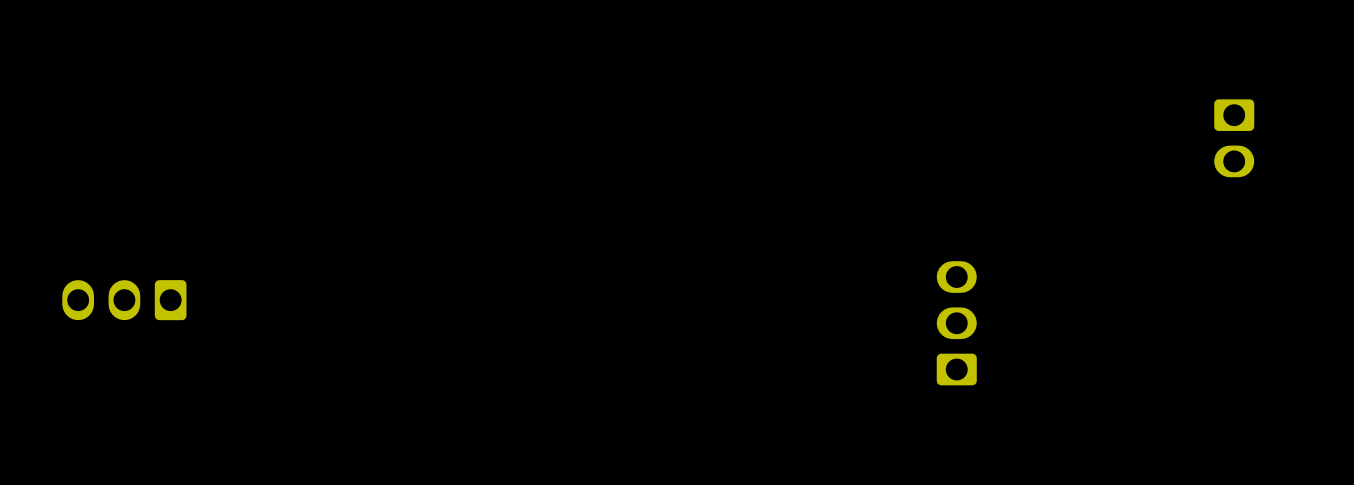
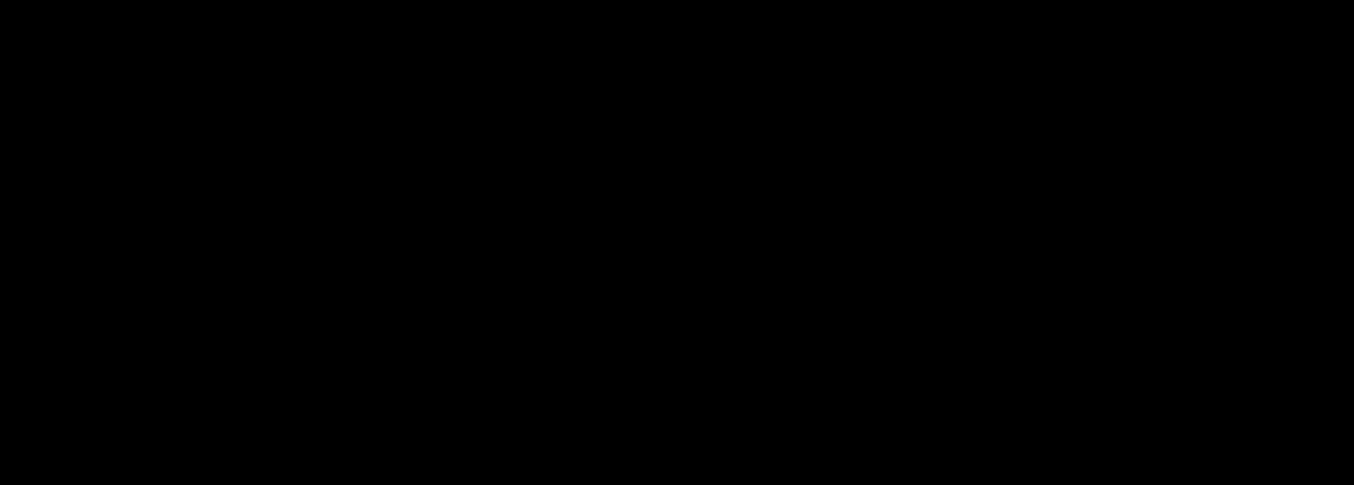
part: (1234, 138) -> none
part: (124, 300) -> none
part: (956, 323) -> none

